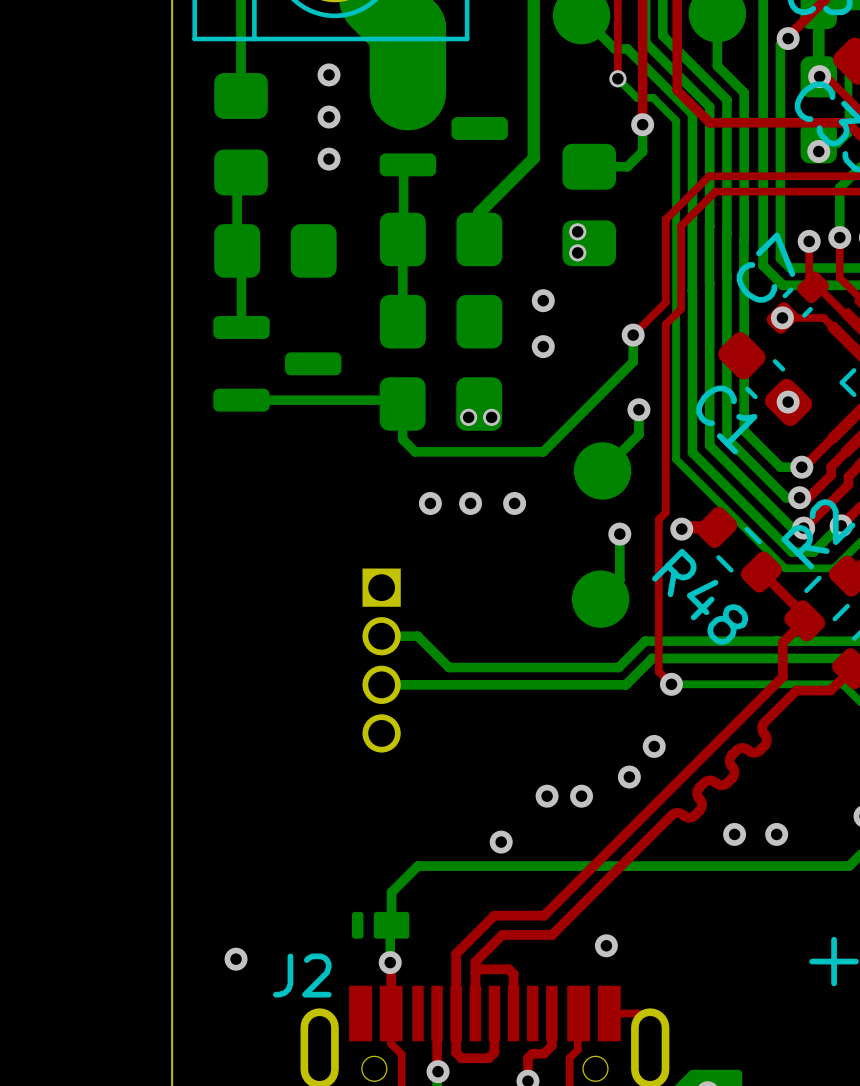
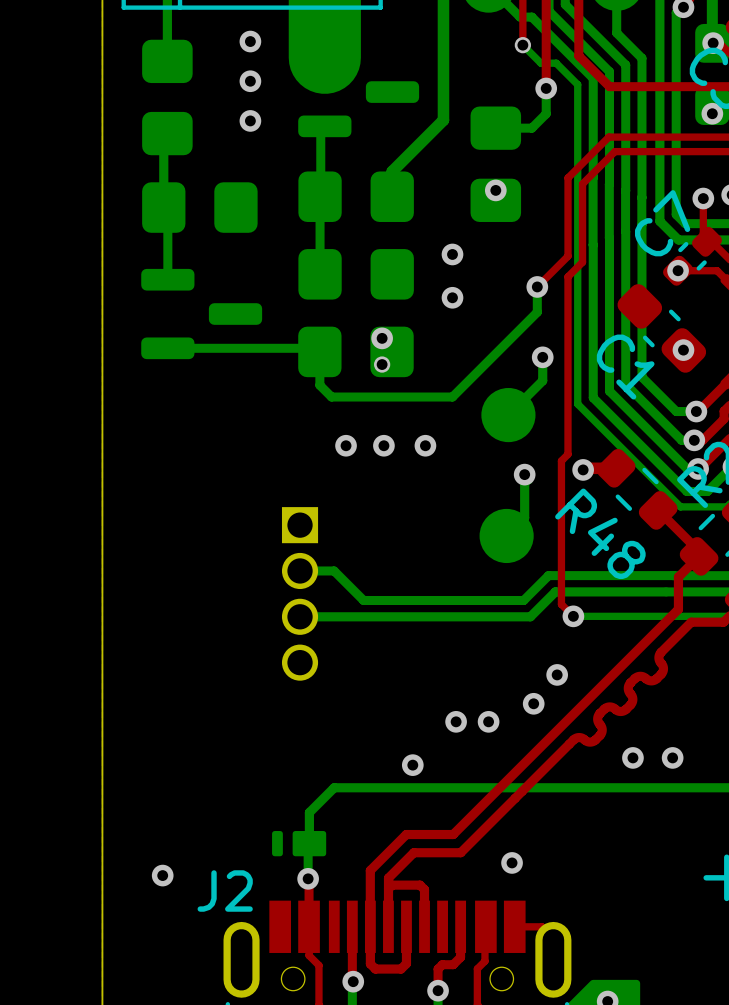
via: (577, 231) -> none
via: none -> (495, 190)
via: (577, 252) -> none
via: none -> (382, 338)
via: (491, 417) -> none

